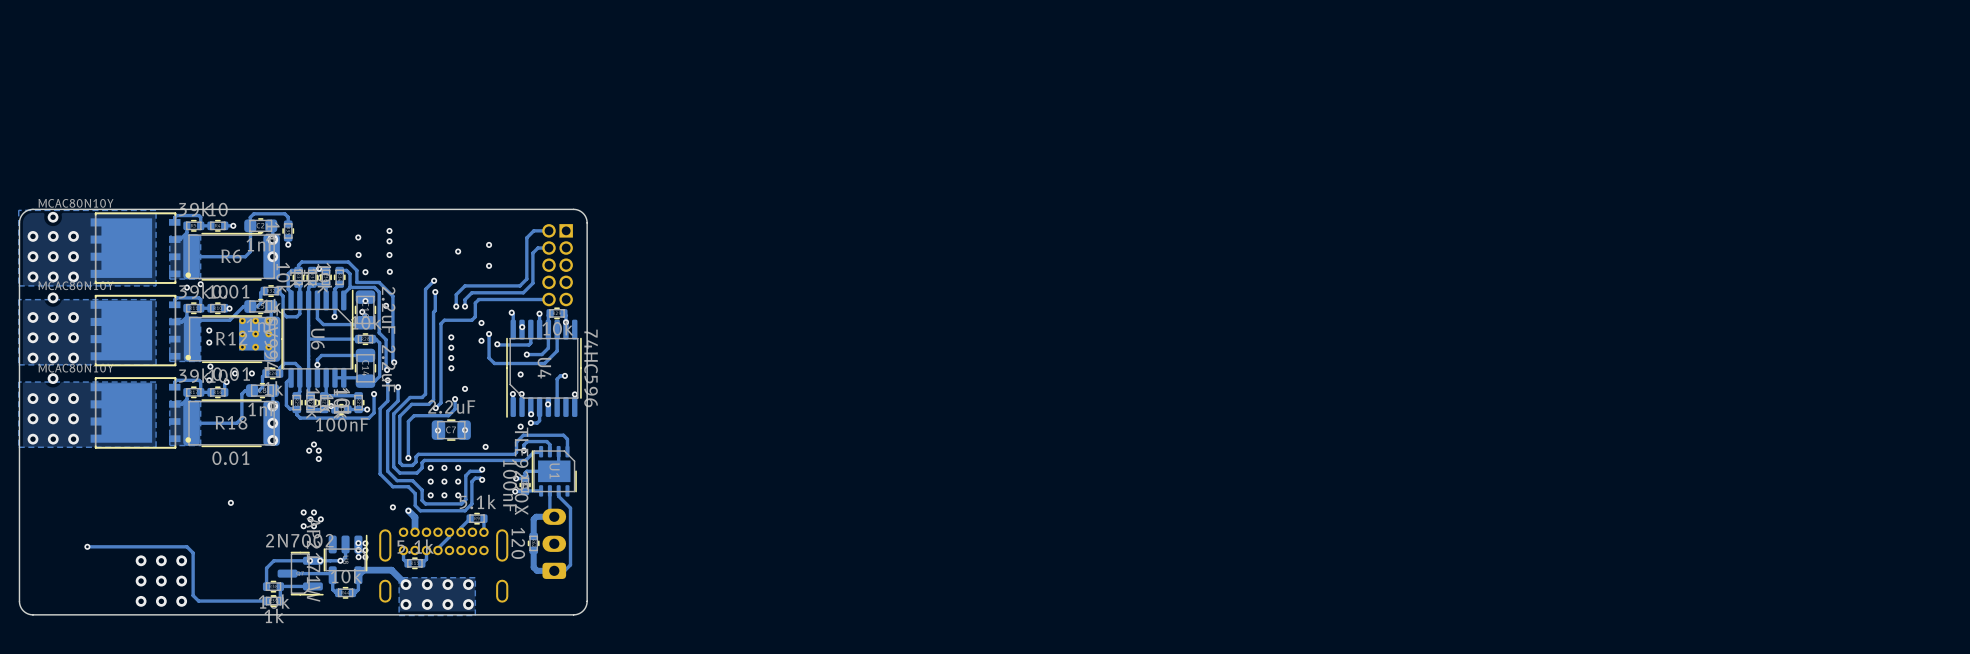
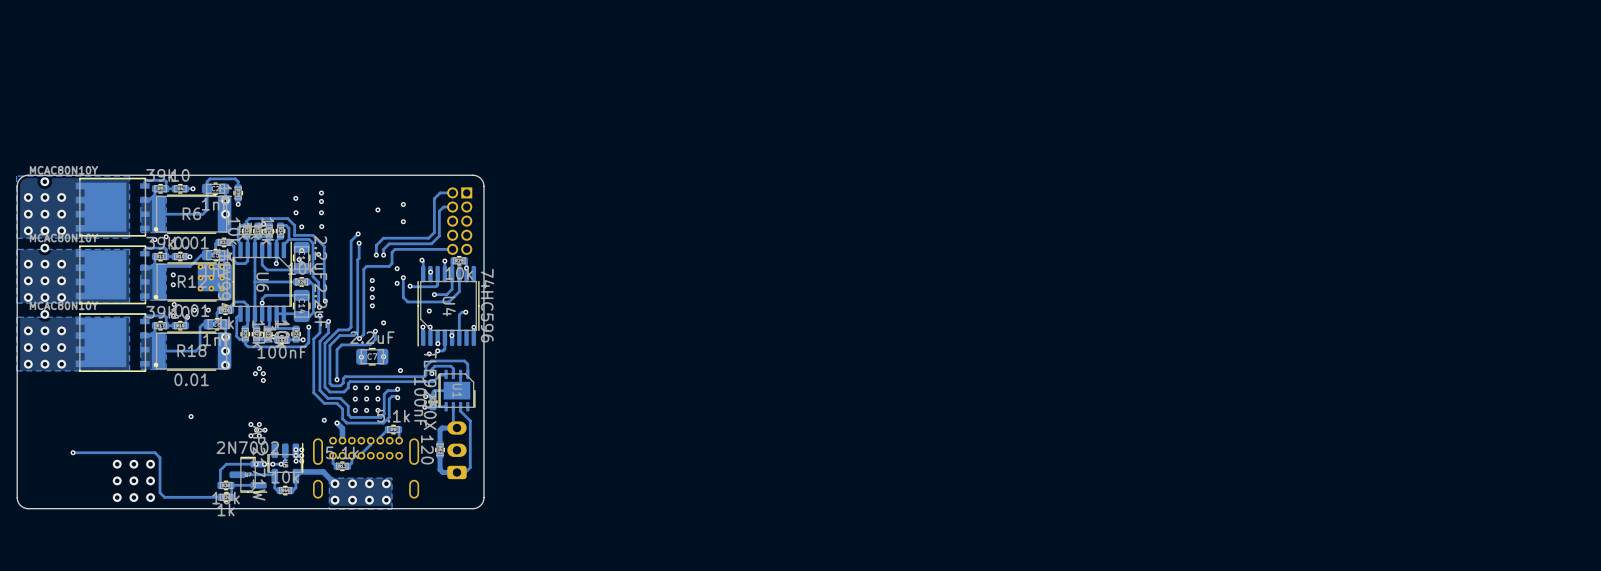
via: none -> (272, 464)

